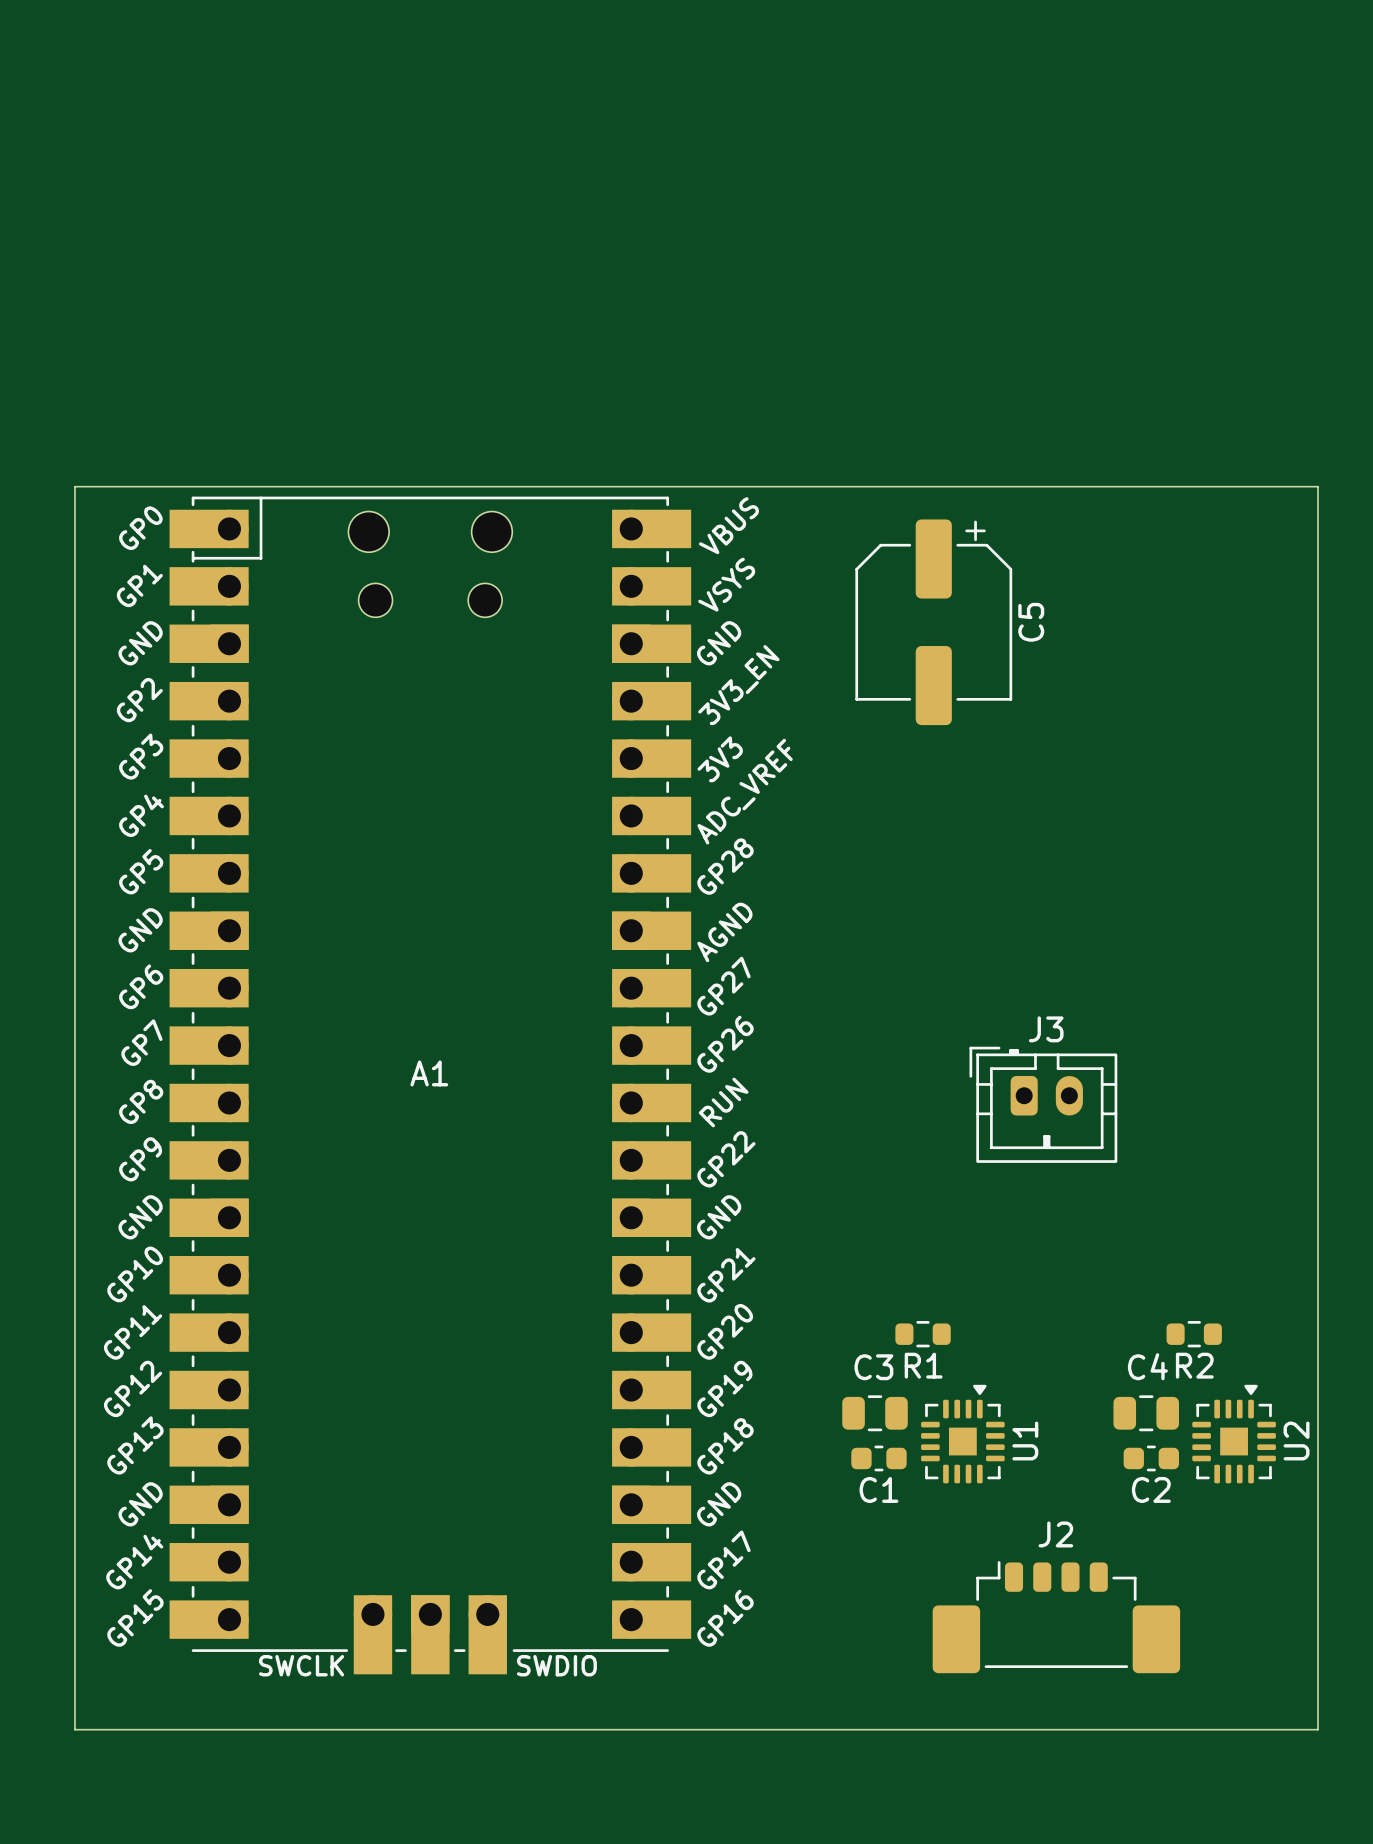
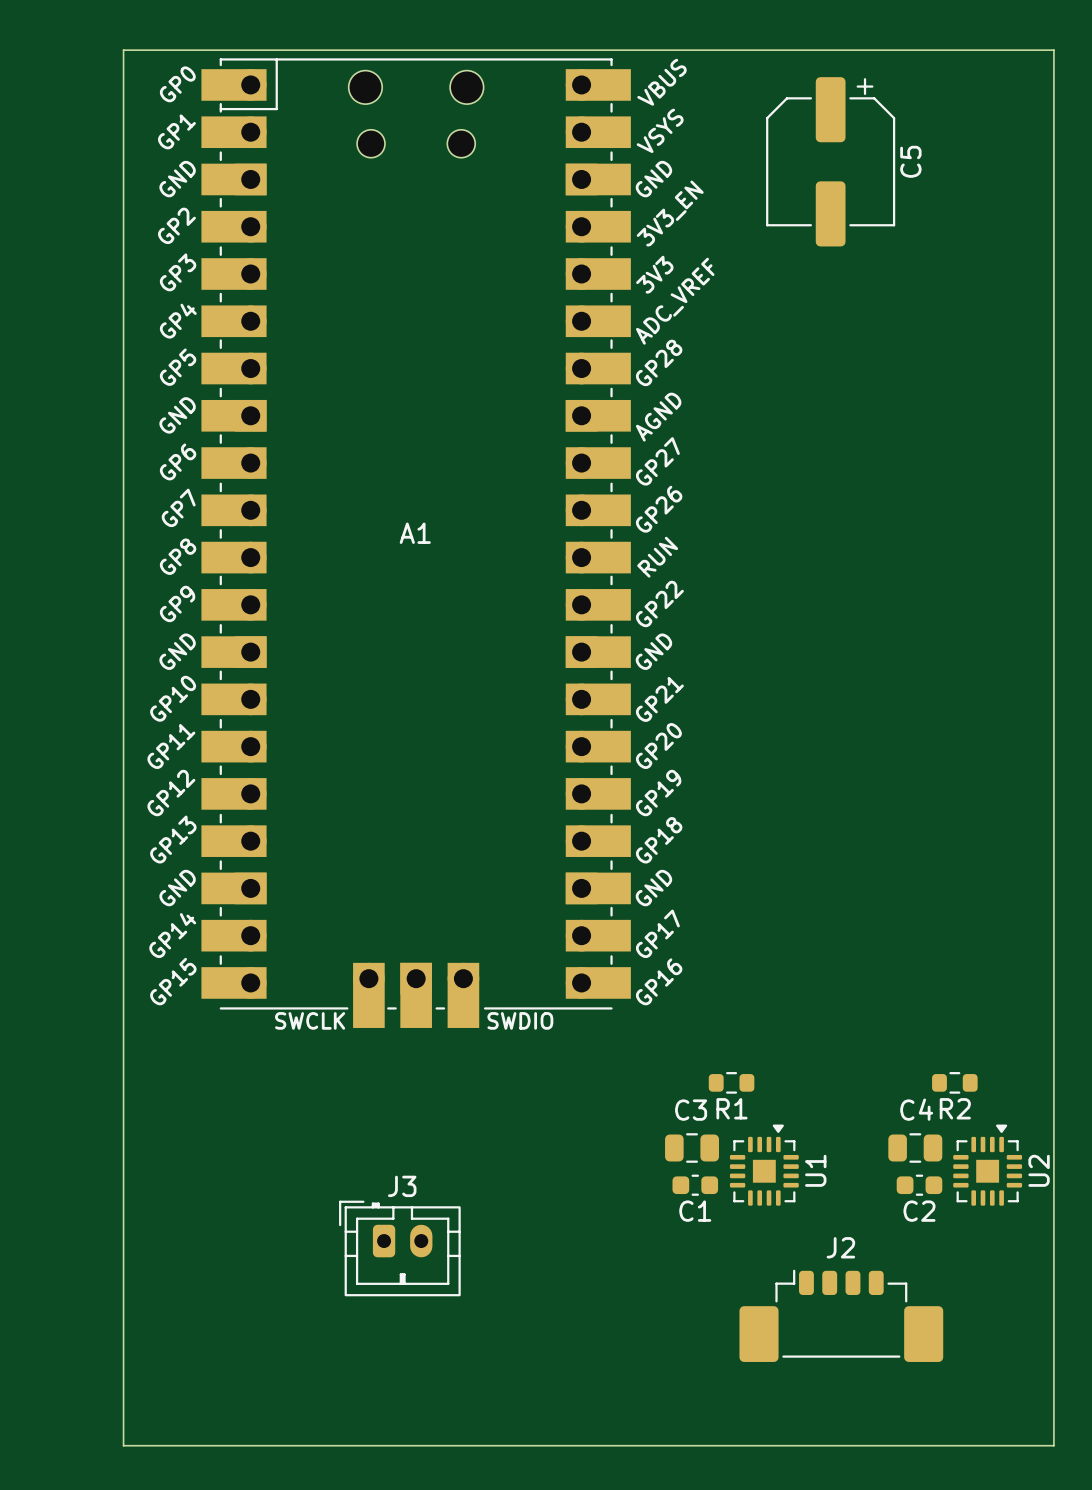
board edge: (74, 486) (1317, 486) (1317, 1729) (74, 1729) (74, 486) -> (123, 50) (123, 1445) (1053, 1445) (1053, 50) (123, 50)
C5 position: (933, 622) -> (830, 161)
A1 position: (430, 1085) -> (416, 543)
J3 position: (1043, 1104) -> (399, 1248)

